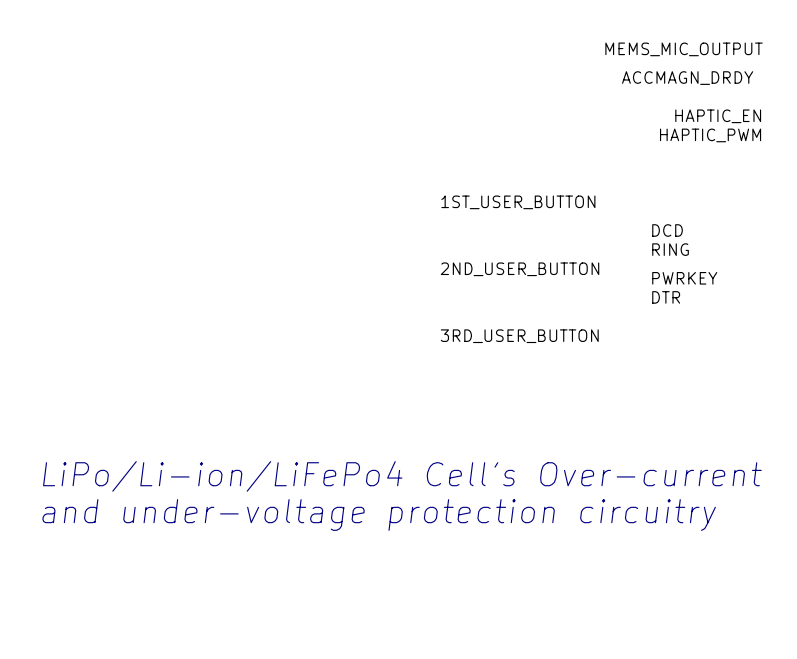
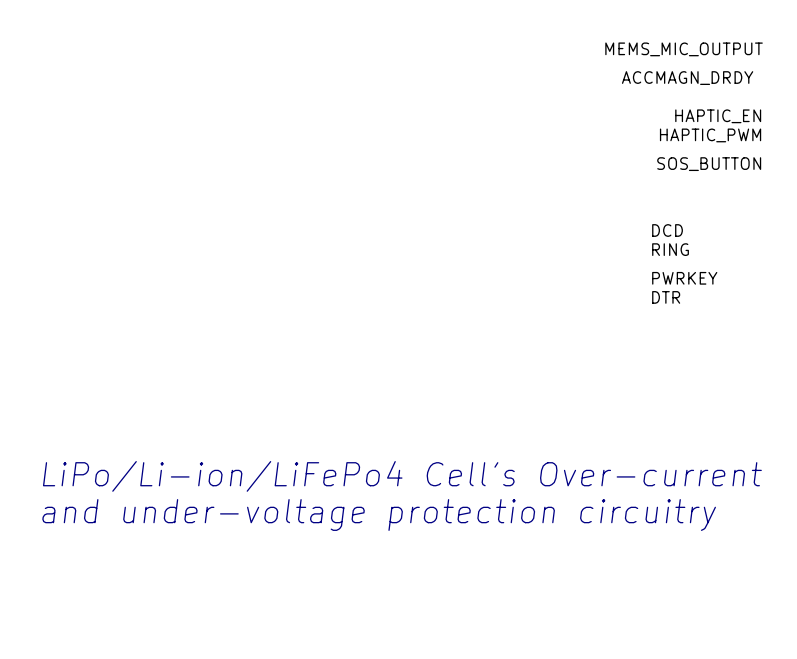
label: none -> SOS_BUTTON (709, 164)
label: 1ST_USER_BUTTON (518, 202) -> none
label: 2ND_USER_BUTTON (520, 269) -> none
label: 3RD_USER_BUTTON (519, 336) -> none

